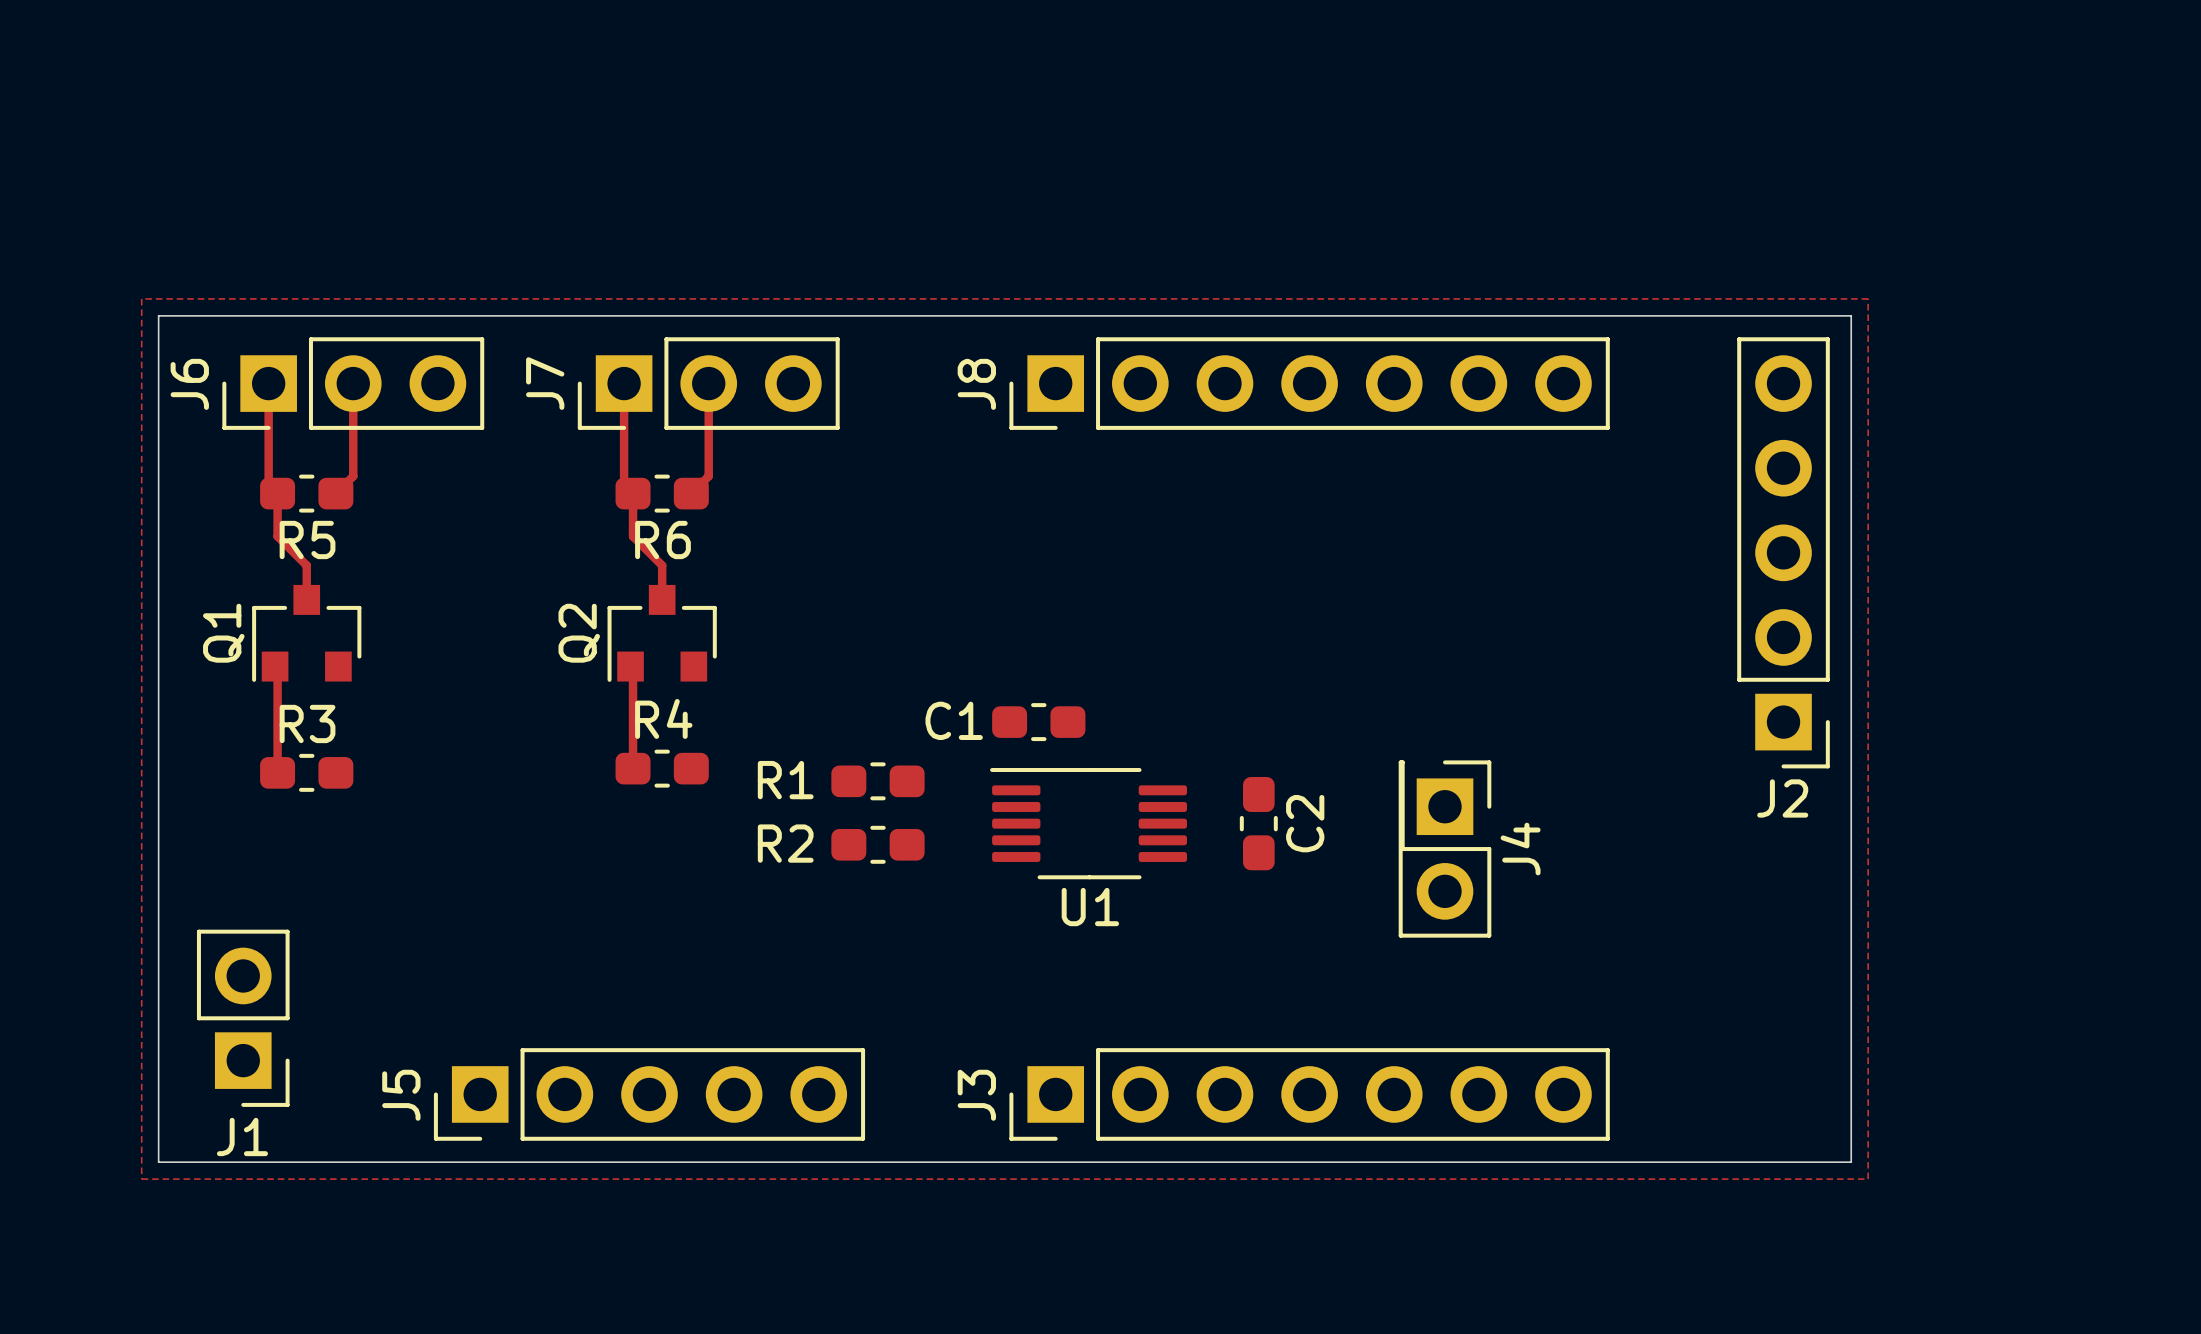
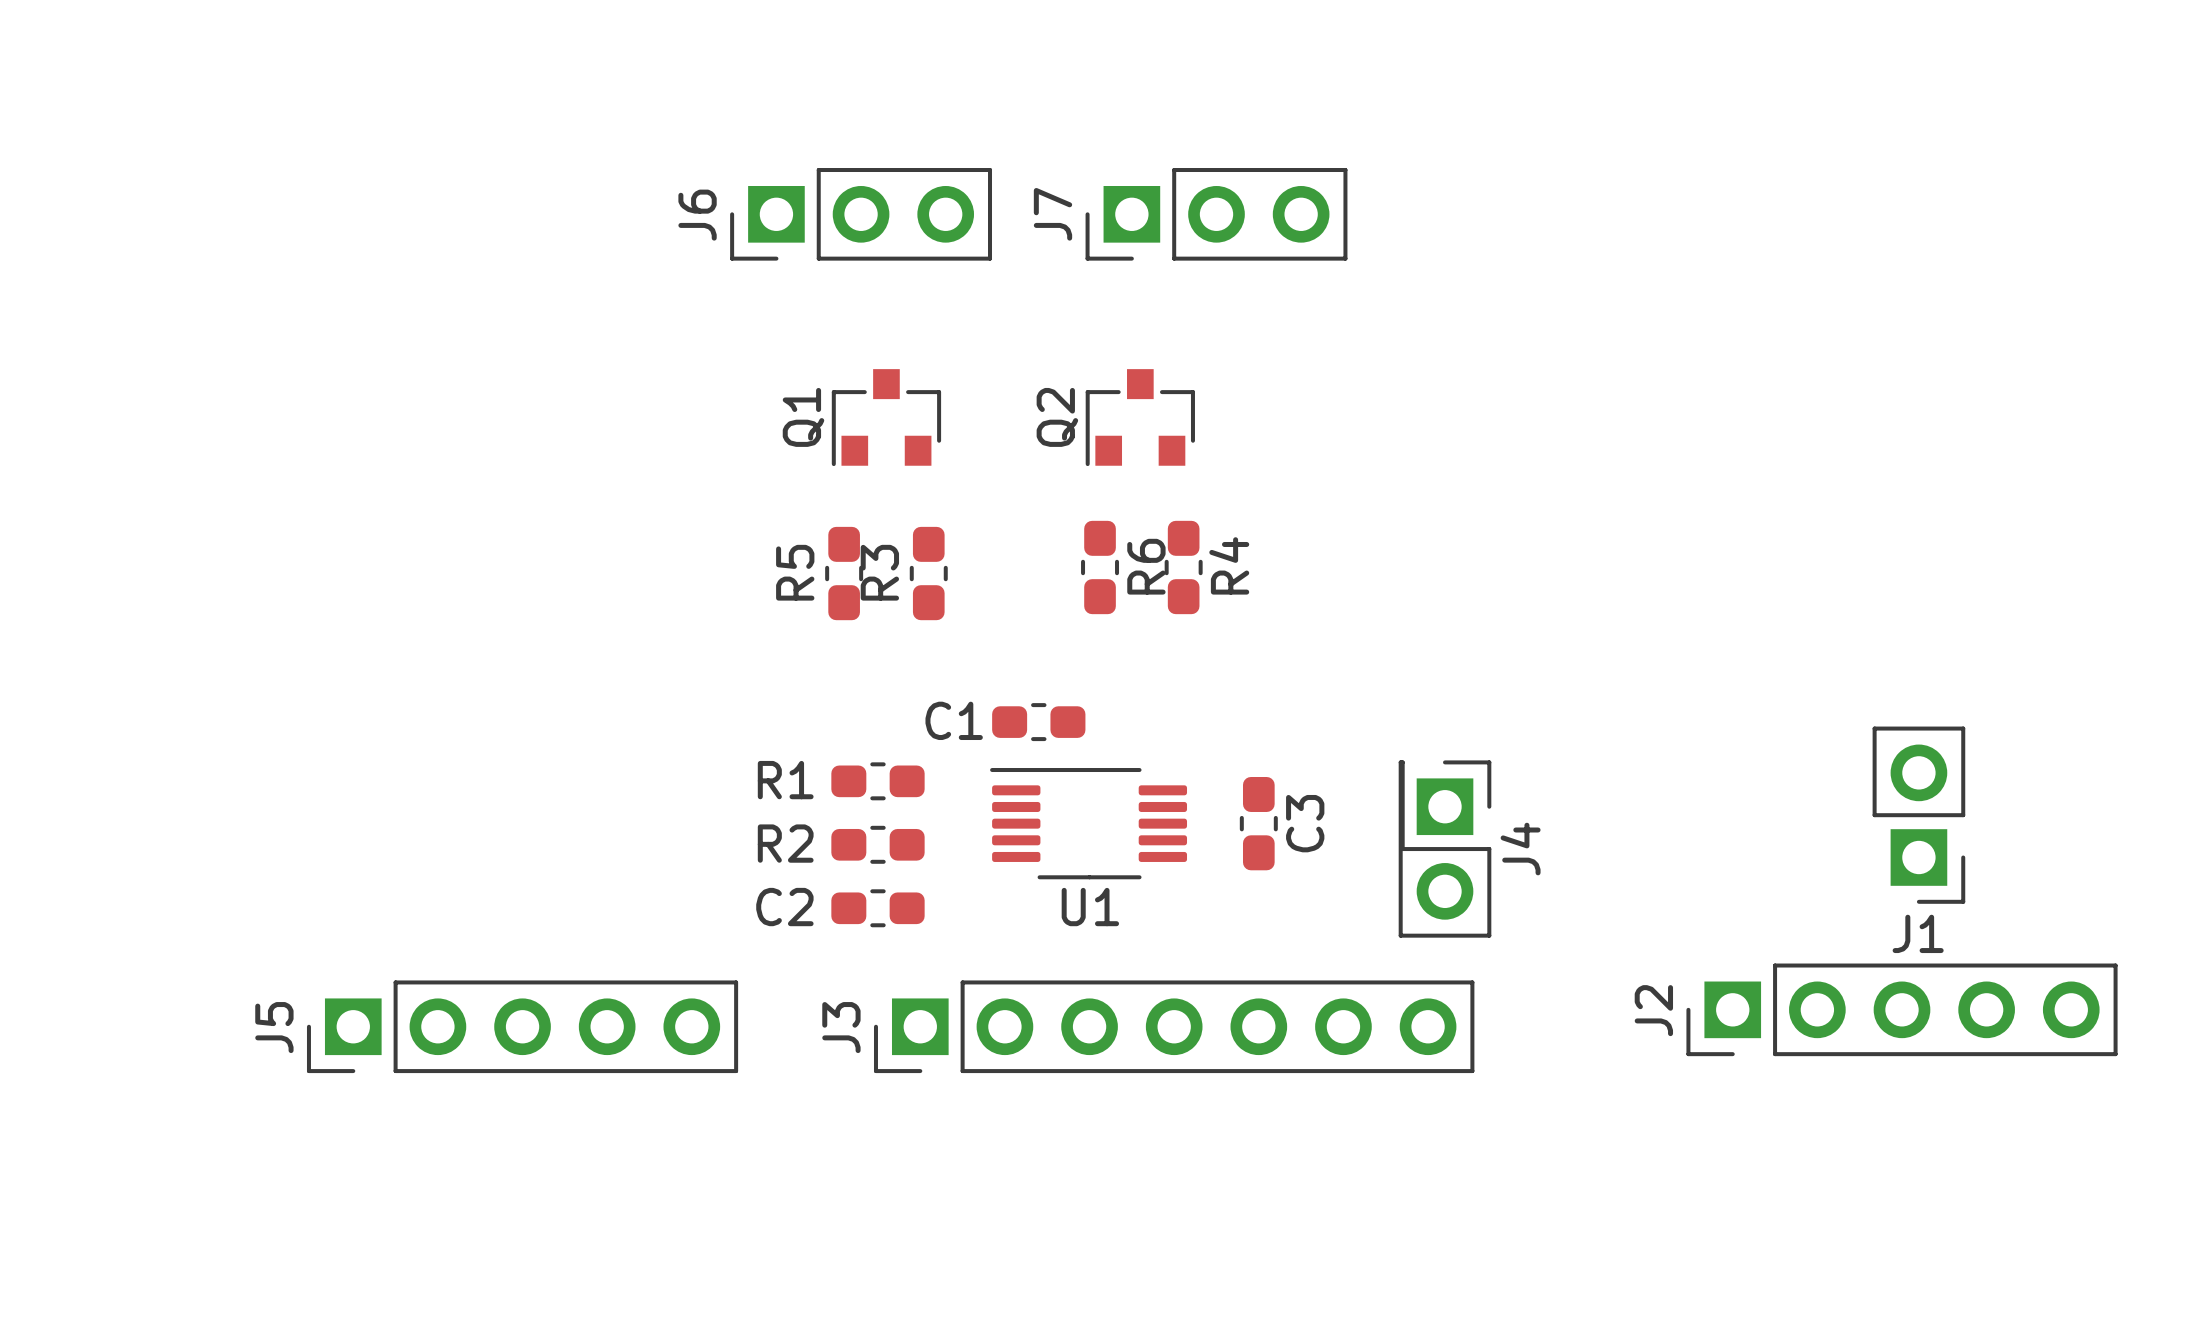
zone outline: (141, 298) (141, 1179) (1868, 1179) (1868, 298) (141, 298) -> none
board edge: (158, 315) (158, 1162) (1851, 1162) (1851, 315) (158, 315) -> none
track: (268, 383) (268, 484) (277, 493) (277, 536) (306, 565) (306, 599) -> none
track: (353, 383) (353, 476) (335, 493) -> none
J6 position: (353, 383) -> (861, 214)
track: (624, 383) (624, 484) (633, 493) (633, 536) (662, 565) (662, 599) -> none
track: (708, 383) (708, 476) (691, 493) -> none
J7 position: (708, 383) -> (1216, 214)
J8: (1309, 383) -> none
R5 rotation: 0° (306, 493) -> 90° clockwise (844, 573)
R5 position: (306, 493) -> (844, 573)
R6 rotation: 0° (662, 493) -> 90° clockwise (1100, 567)
R6 position: (662, 493) -> (1100, 567)
R6 name position: R6 (662, 539) -> R6 (1146, 566)
J2 rotation: 0° (1783, 552) -> 90° clockwise (1902, 1009)
J2 position: (1783, 552) -> (1902, 1009)
Q1 position: (306, 633) -> (886, 417)
Q2 position: (662, 633) -> (1140, 417)
track: (275, 666) (277, 669) (277, 772) -> none
track: (630, 666) (633, 669) (633, 768) -> none
R3 name position: R3 (307, 723) -> R3 (879, 572)
R4 rotation: 0° (662, 768) -> 90° clockwise (1183, 567)
R4 position: (662, 768) -> (1183, 567)
R3 rotation: 0° (306, 772) -> 90° clockwise (928, 573)
R3 position: (306, 772) -> (928, 573)
C2 name: C2 (1305, 823) -> C3 (1305, 823)
C2: none -> (877, 908)
J1 position: (243, 1018) -> (1918, 815)
J5 position: (649, 1094) -> (522, 1026)
J3 position: (1309, 1094) -> (1174, 1026)

